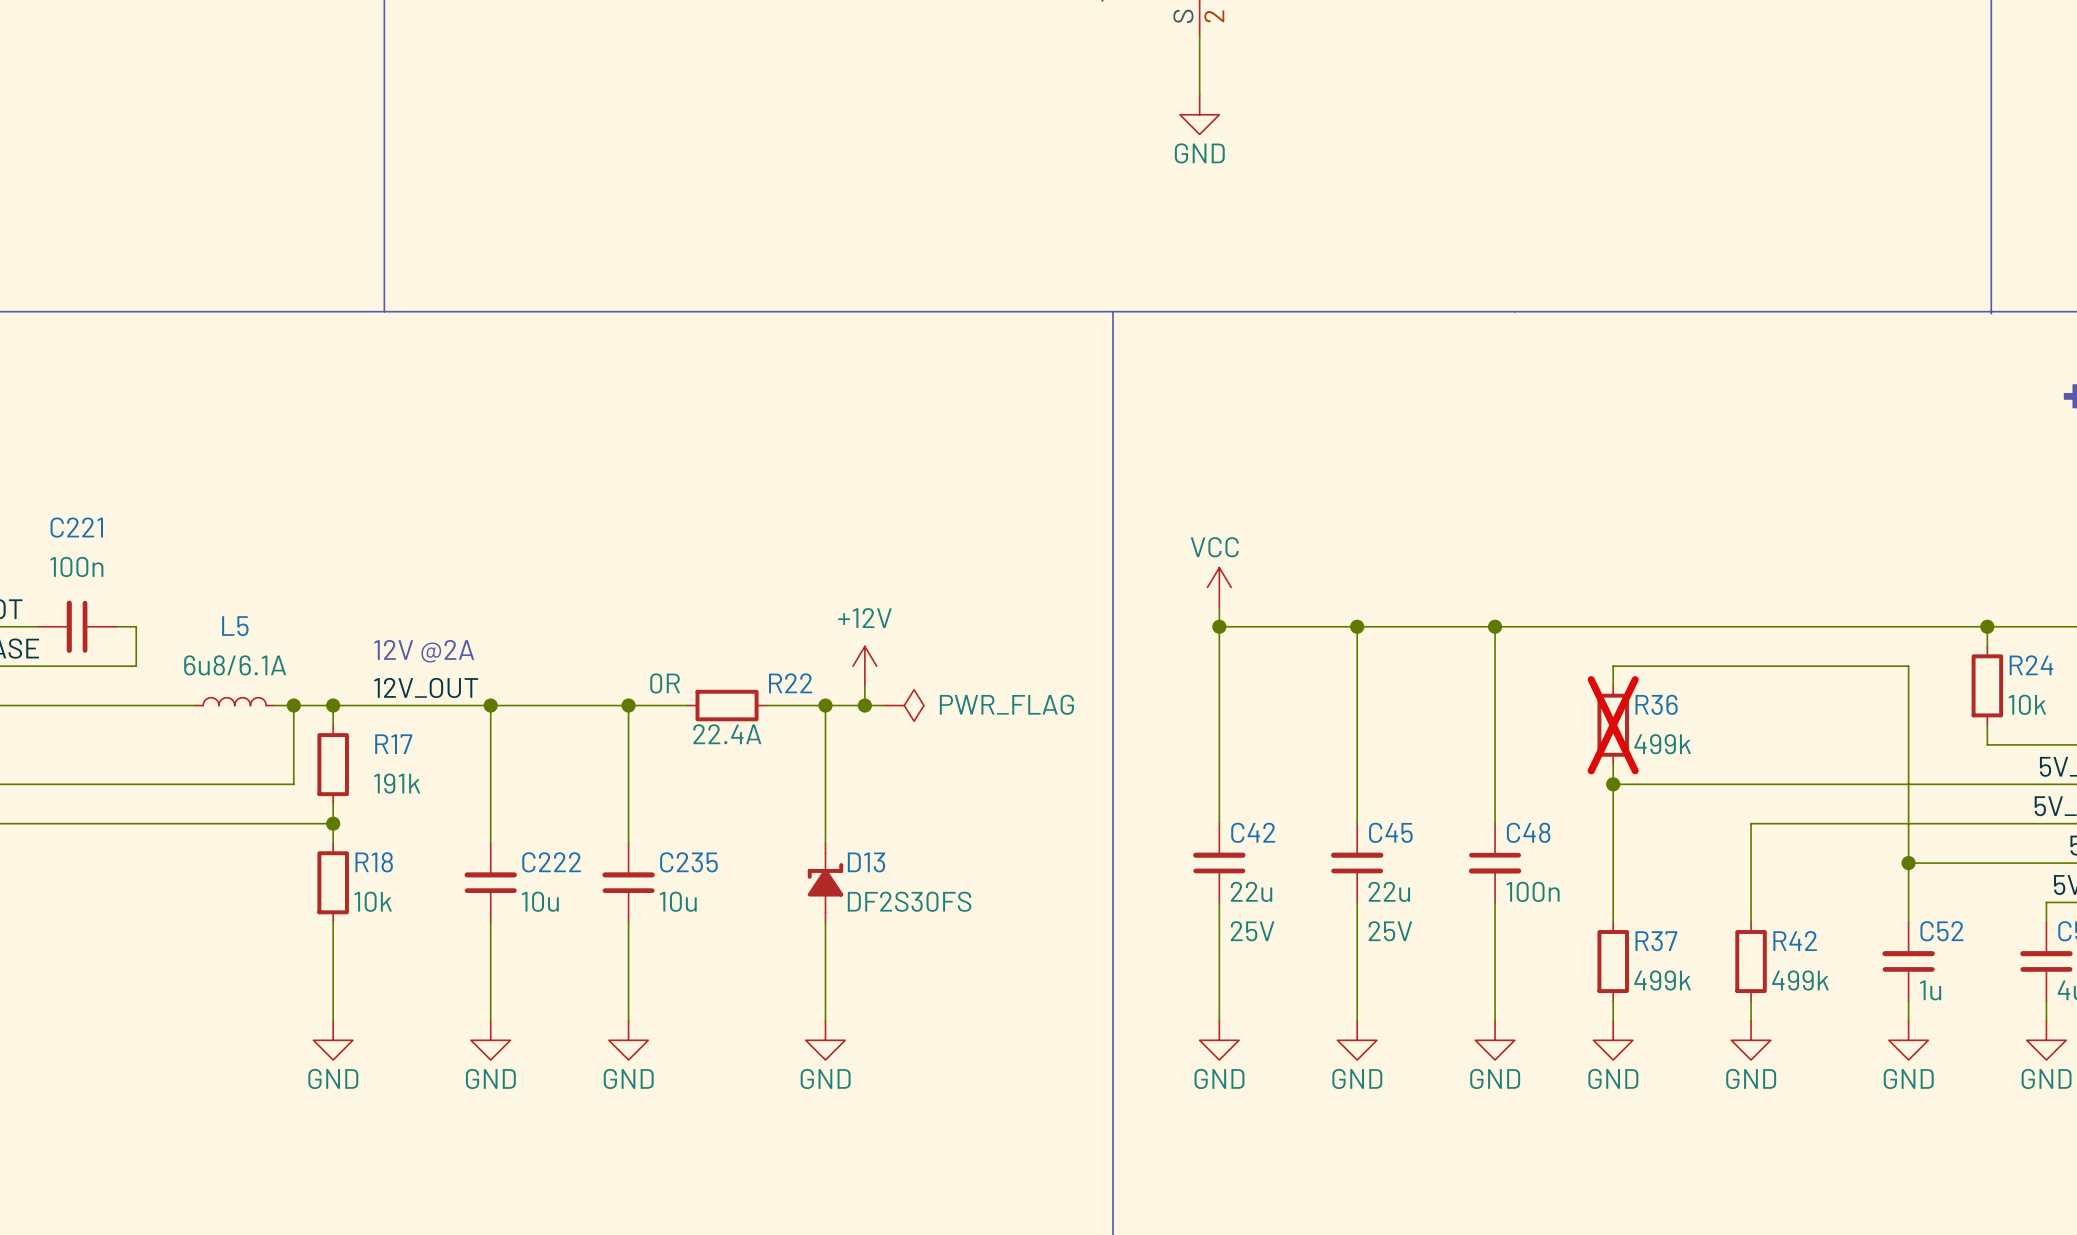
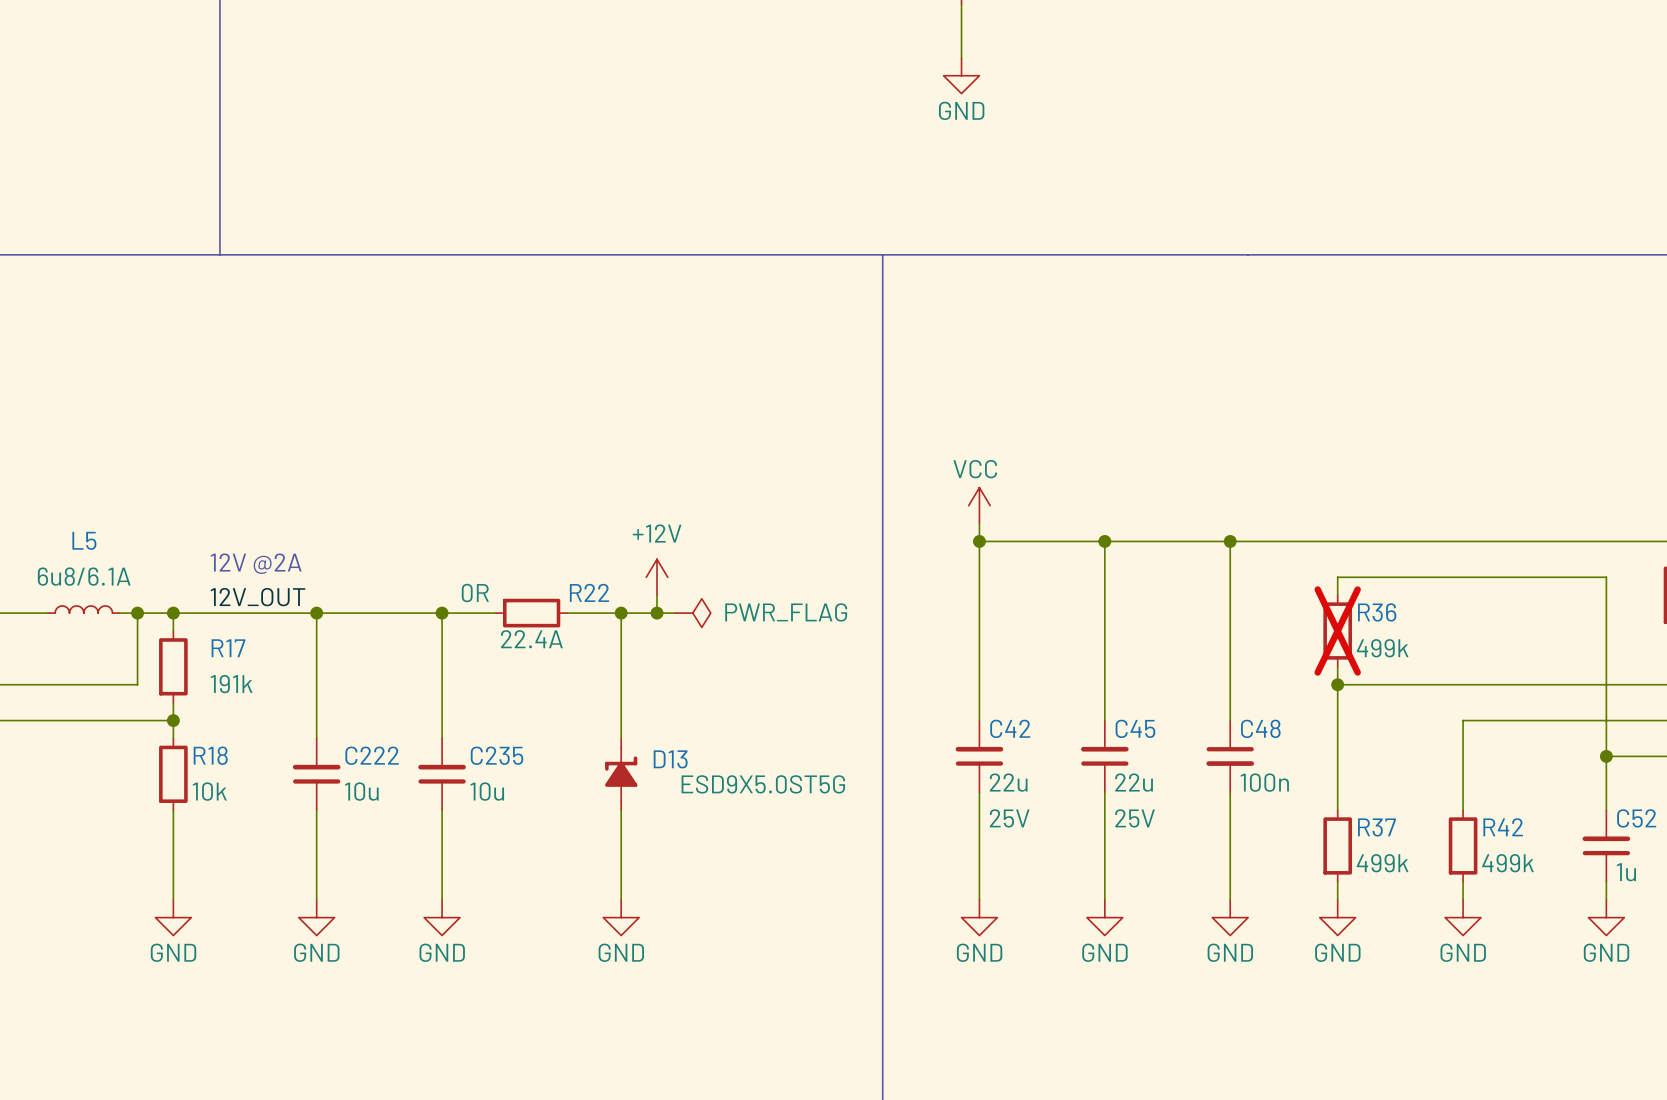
D13 name position: D13 (866, 862) -> D13 (670, 759)
D13 text: DF2S30FS (909, 901) -> ESD9X5.0ST5G (763, 784)

